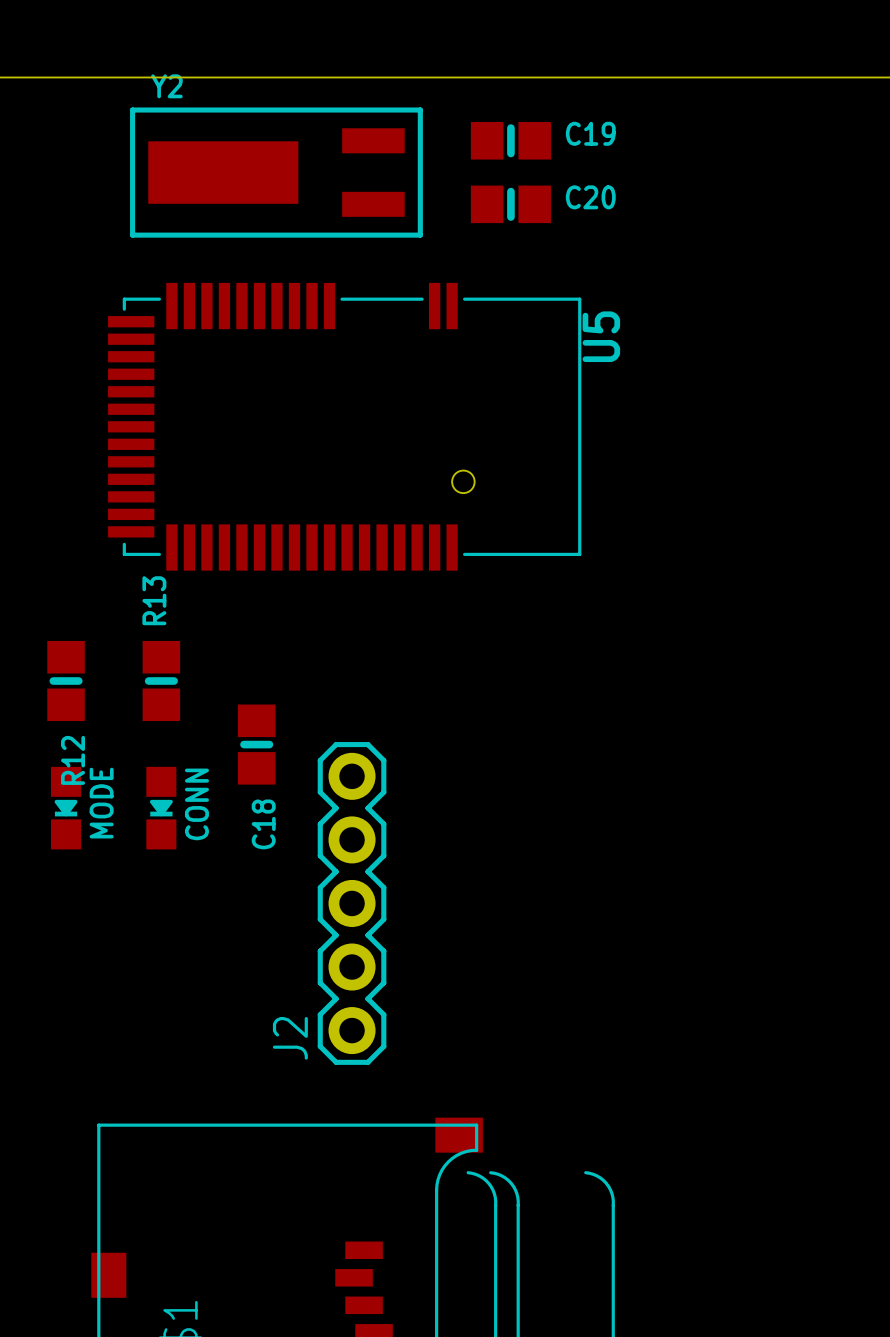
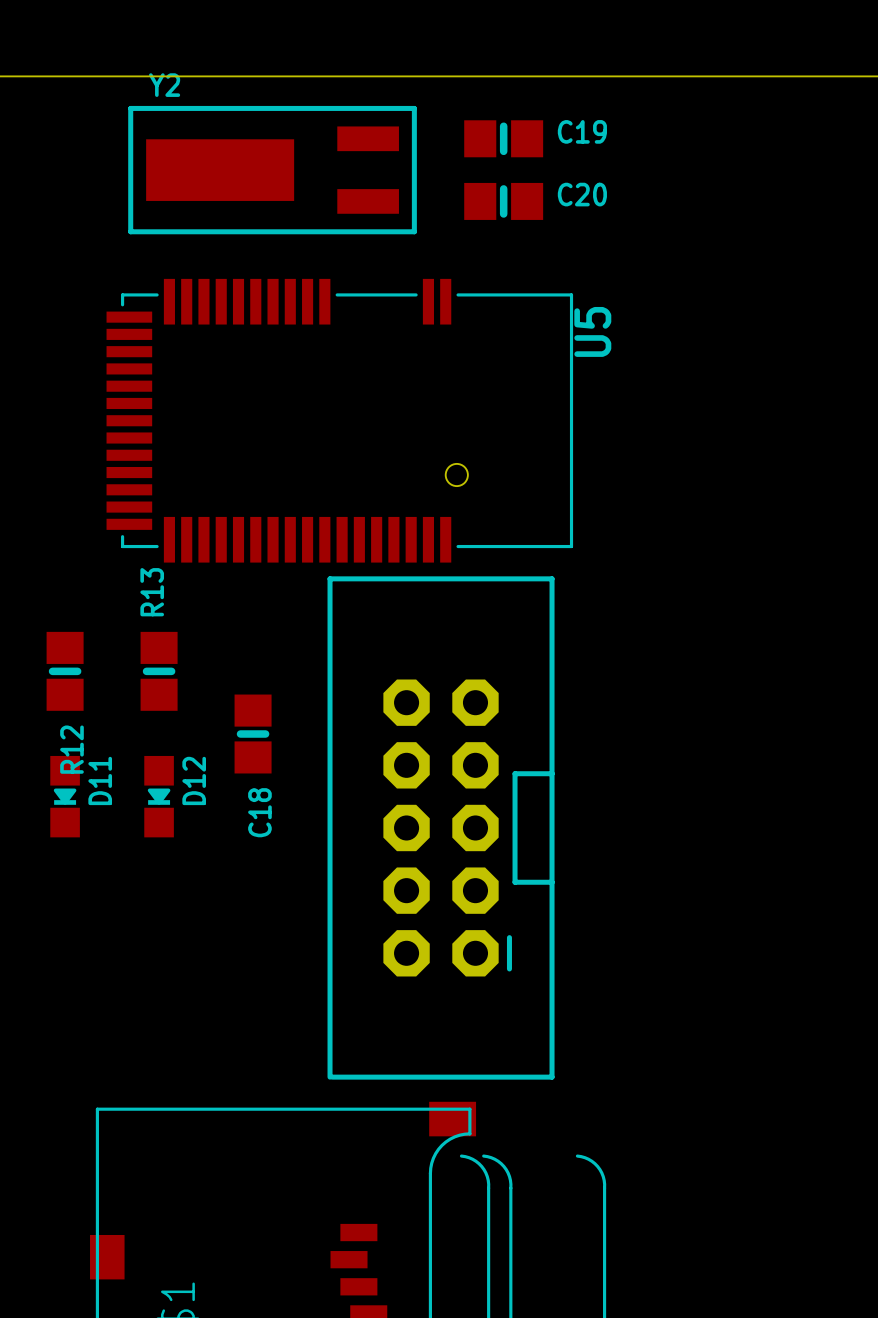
MODE name: MODE (101, 803) -> D11 (100, 780)
CONN name: CONN (196, 804) -> D12 (194, 780)
part: none -> (441, 827)
J2: (352, 903) -> none

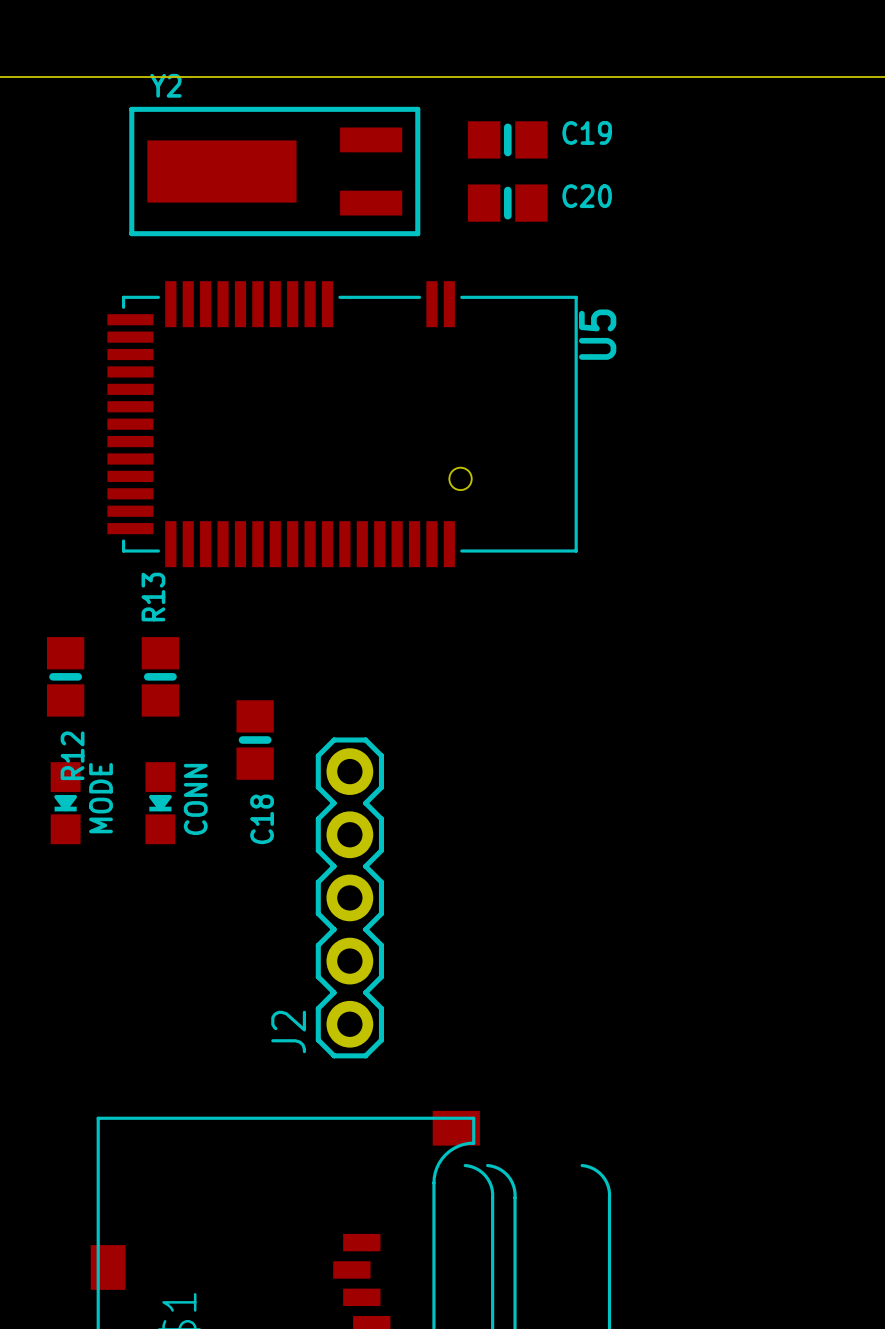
D11 name: D11 (100, 780) -> MODE (101, 798)
D12 name: D12 (194, 780) -> CONN (195, 799)
part: (441, 827) -> none
J2: none -> (349, 897)

